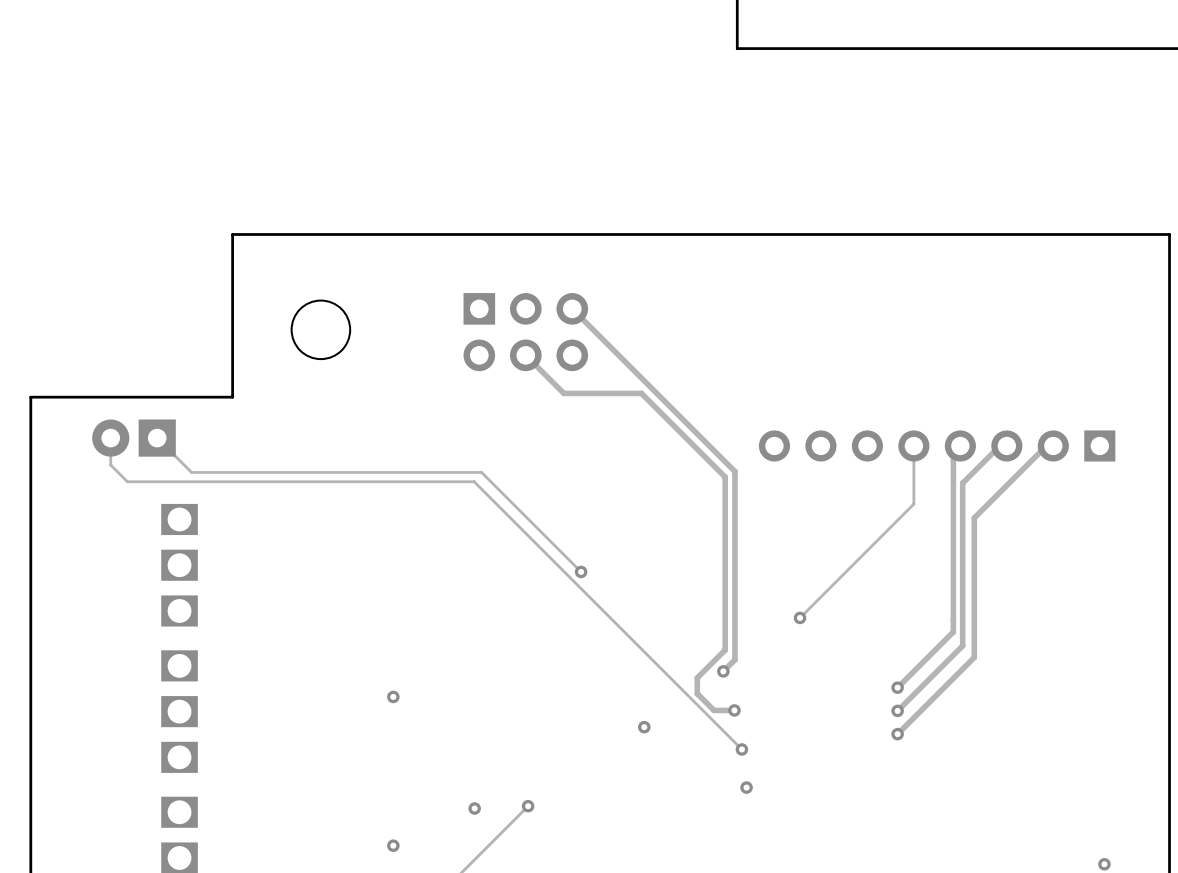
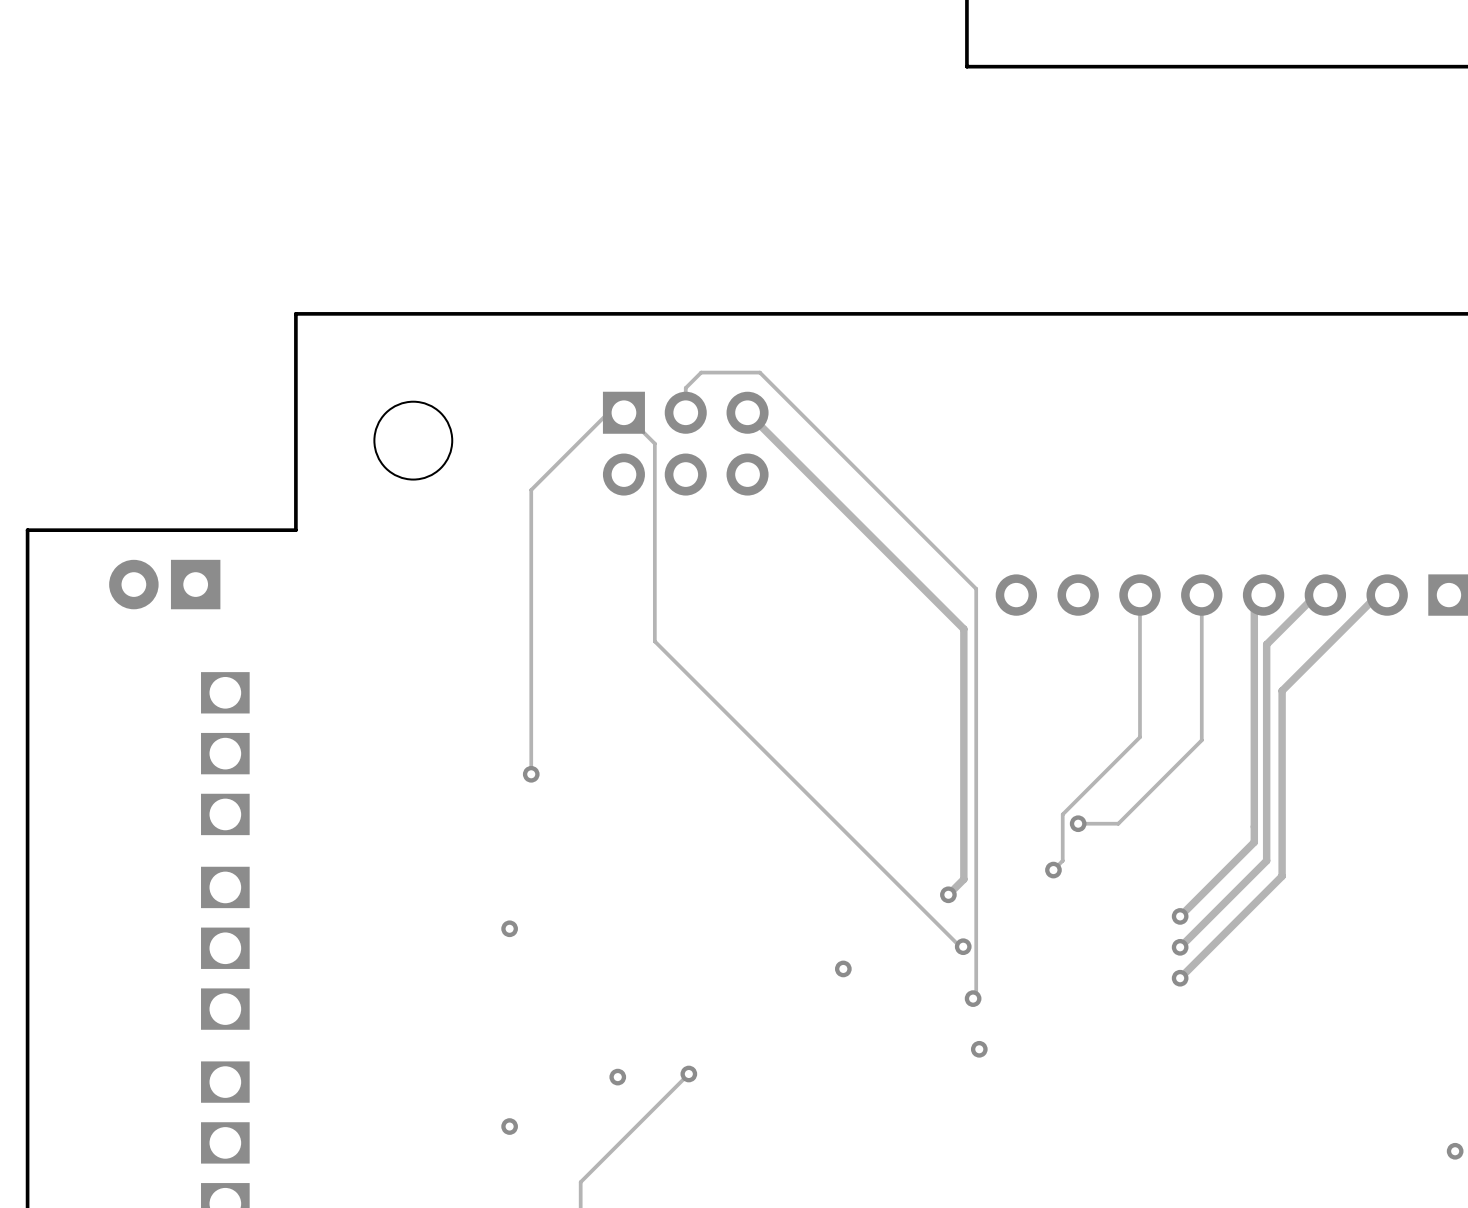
track: none -> (685, 412) (685, 388) (701, 372) (759, 372) (976, 588) (976, 993) (973, 996)
track: (525, 355) (563, 393) (641, 393) (725, 477) (725, 650) (697, 677) (697, 693) (714, 710) (734, 710) -> none
track: (157, 438) (191, 472) (481, 472) (581, 571) -> none
track: none -> (1139, 595) (1139, 737) (1062, 814) (1062, 860) (1053, 870)
track: (110, 448) (110, 465) (127, 481) (474, 481) (741, 749) -> none
track: (913, 504) (800, 617) -> (1201, 672) (1201, 740) (1118, 823) (1078, 823)
via: (581, 571) -> none
track: none -> (531, 774) (531, 490) (608, 412) (623, 412) (654, 443) (654, 641) (960, 947)
via: none -> (531, 774)
via: (800, 617) -> none
via: none -> (1078, 823)
via: none -> (1053, 870)

